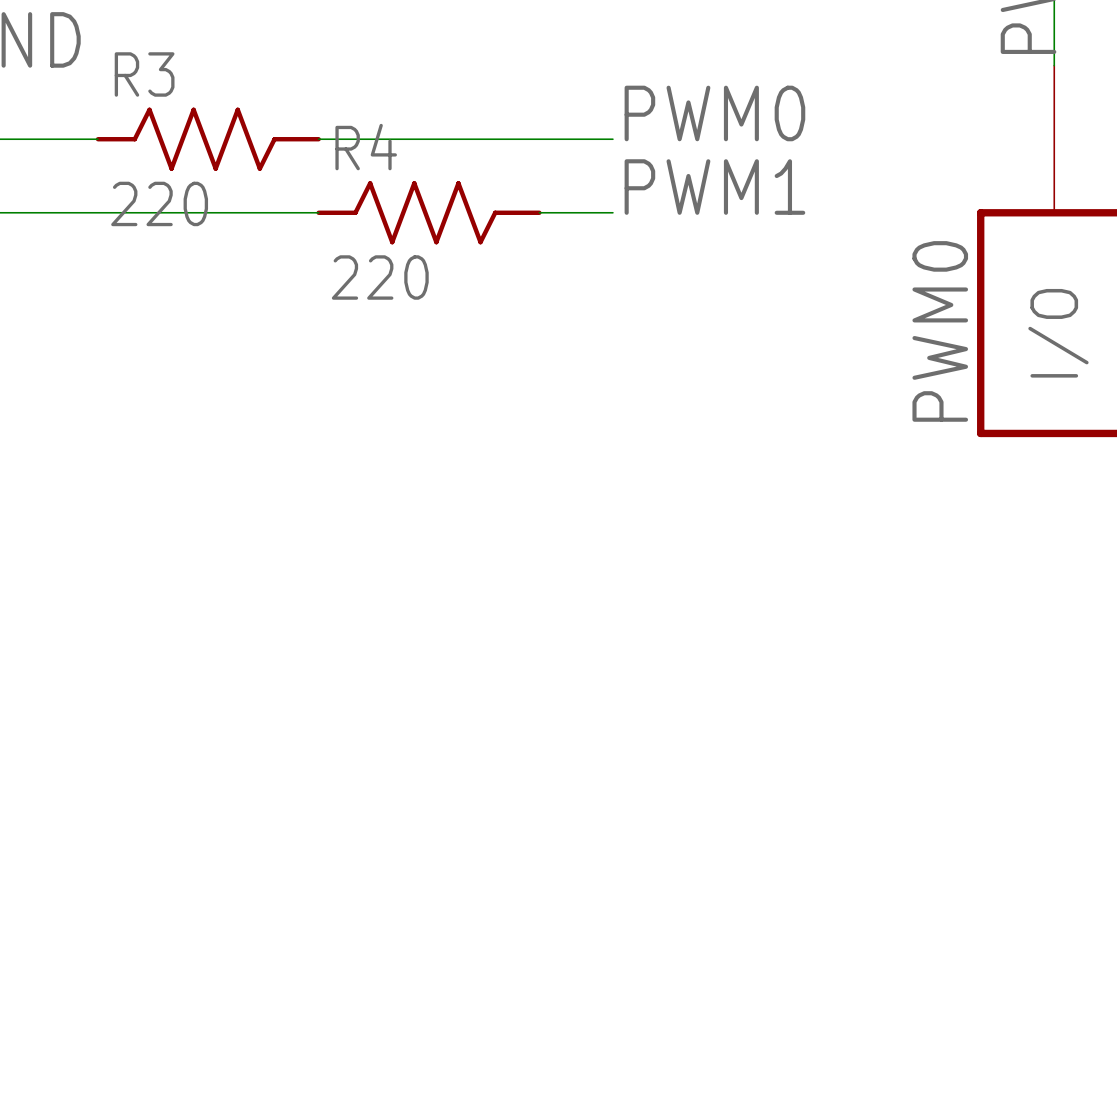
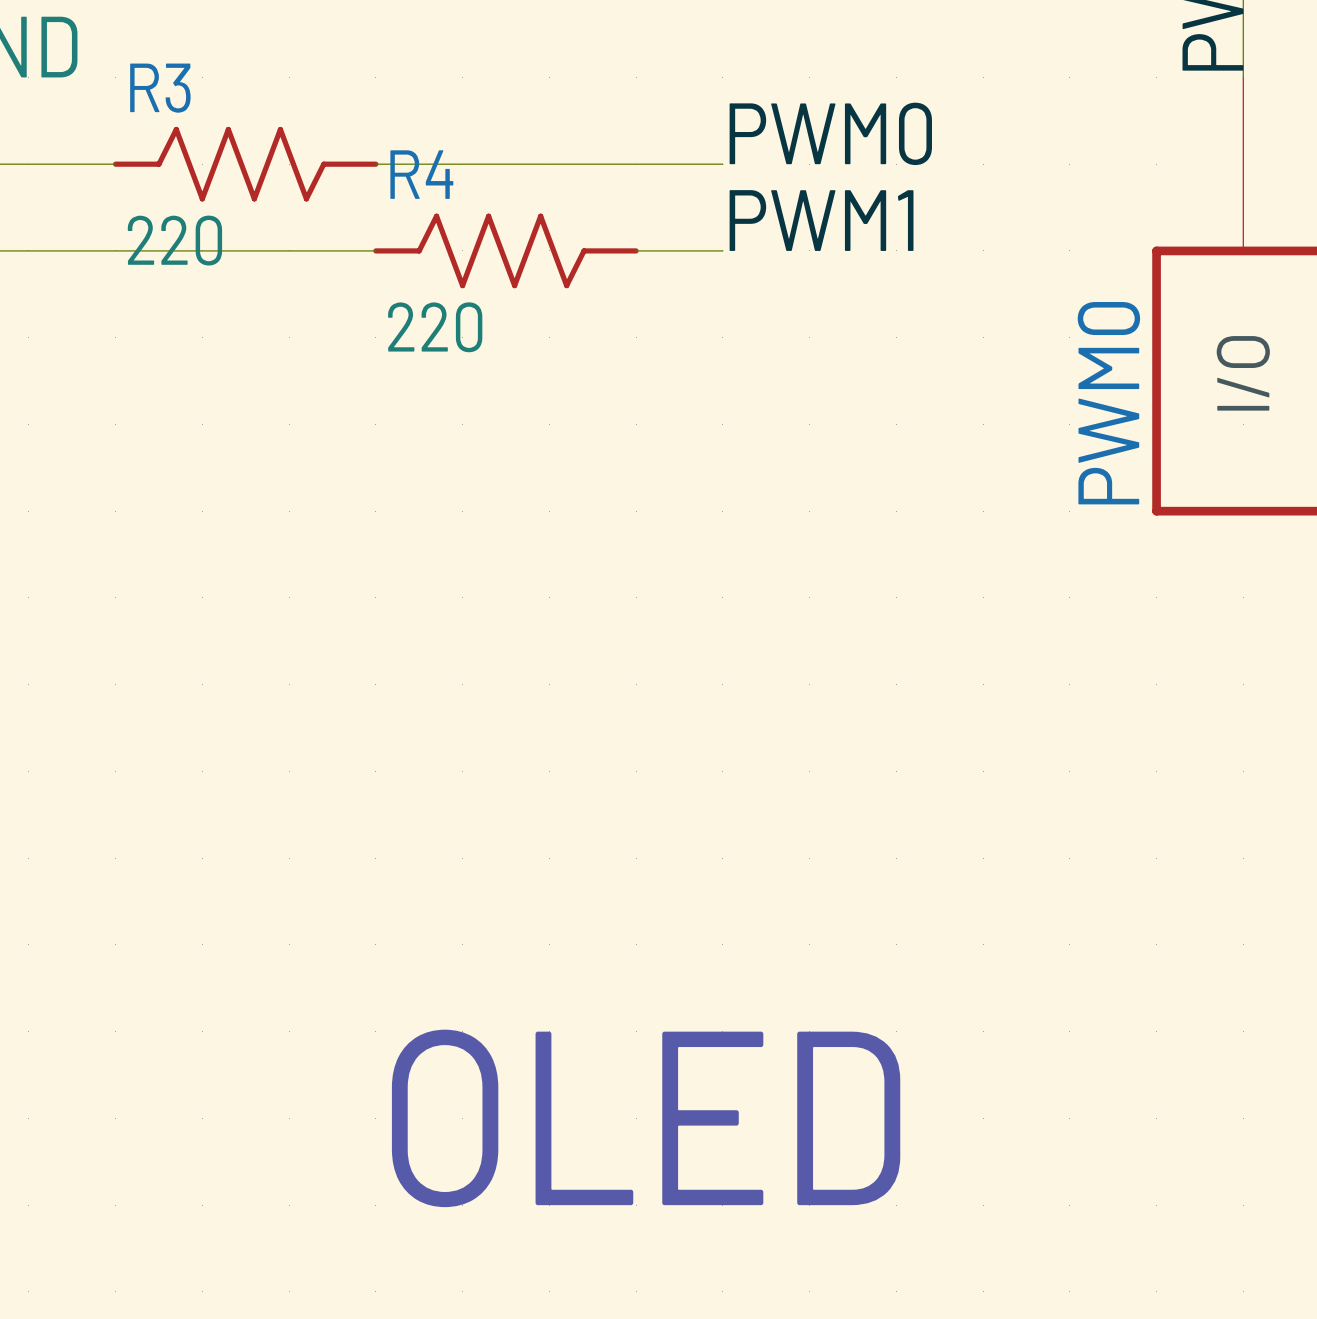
text: none -> OLED (646, 1118)

